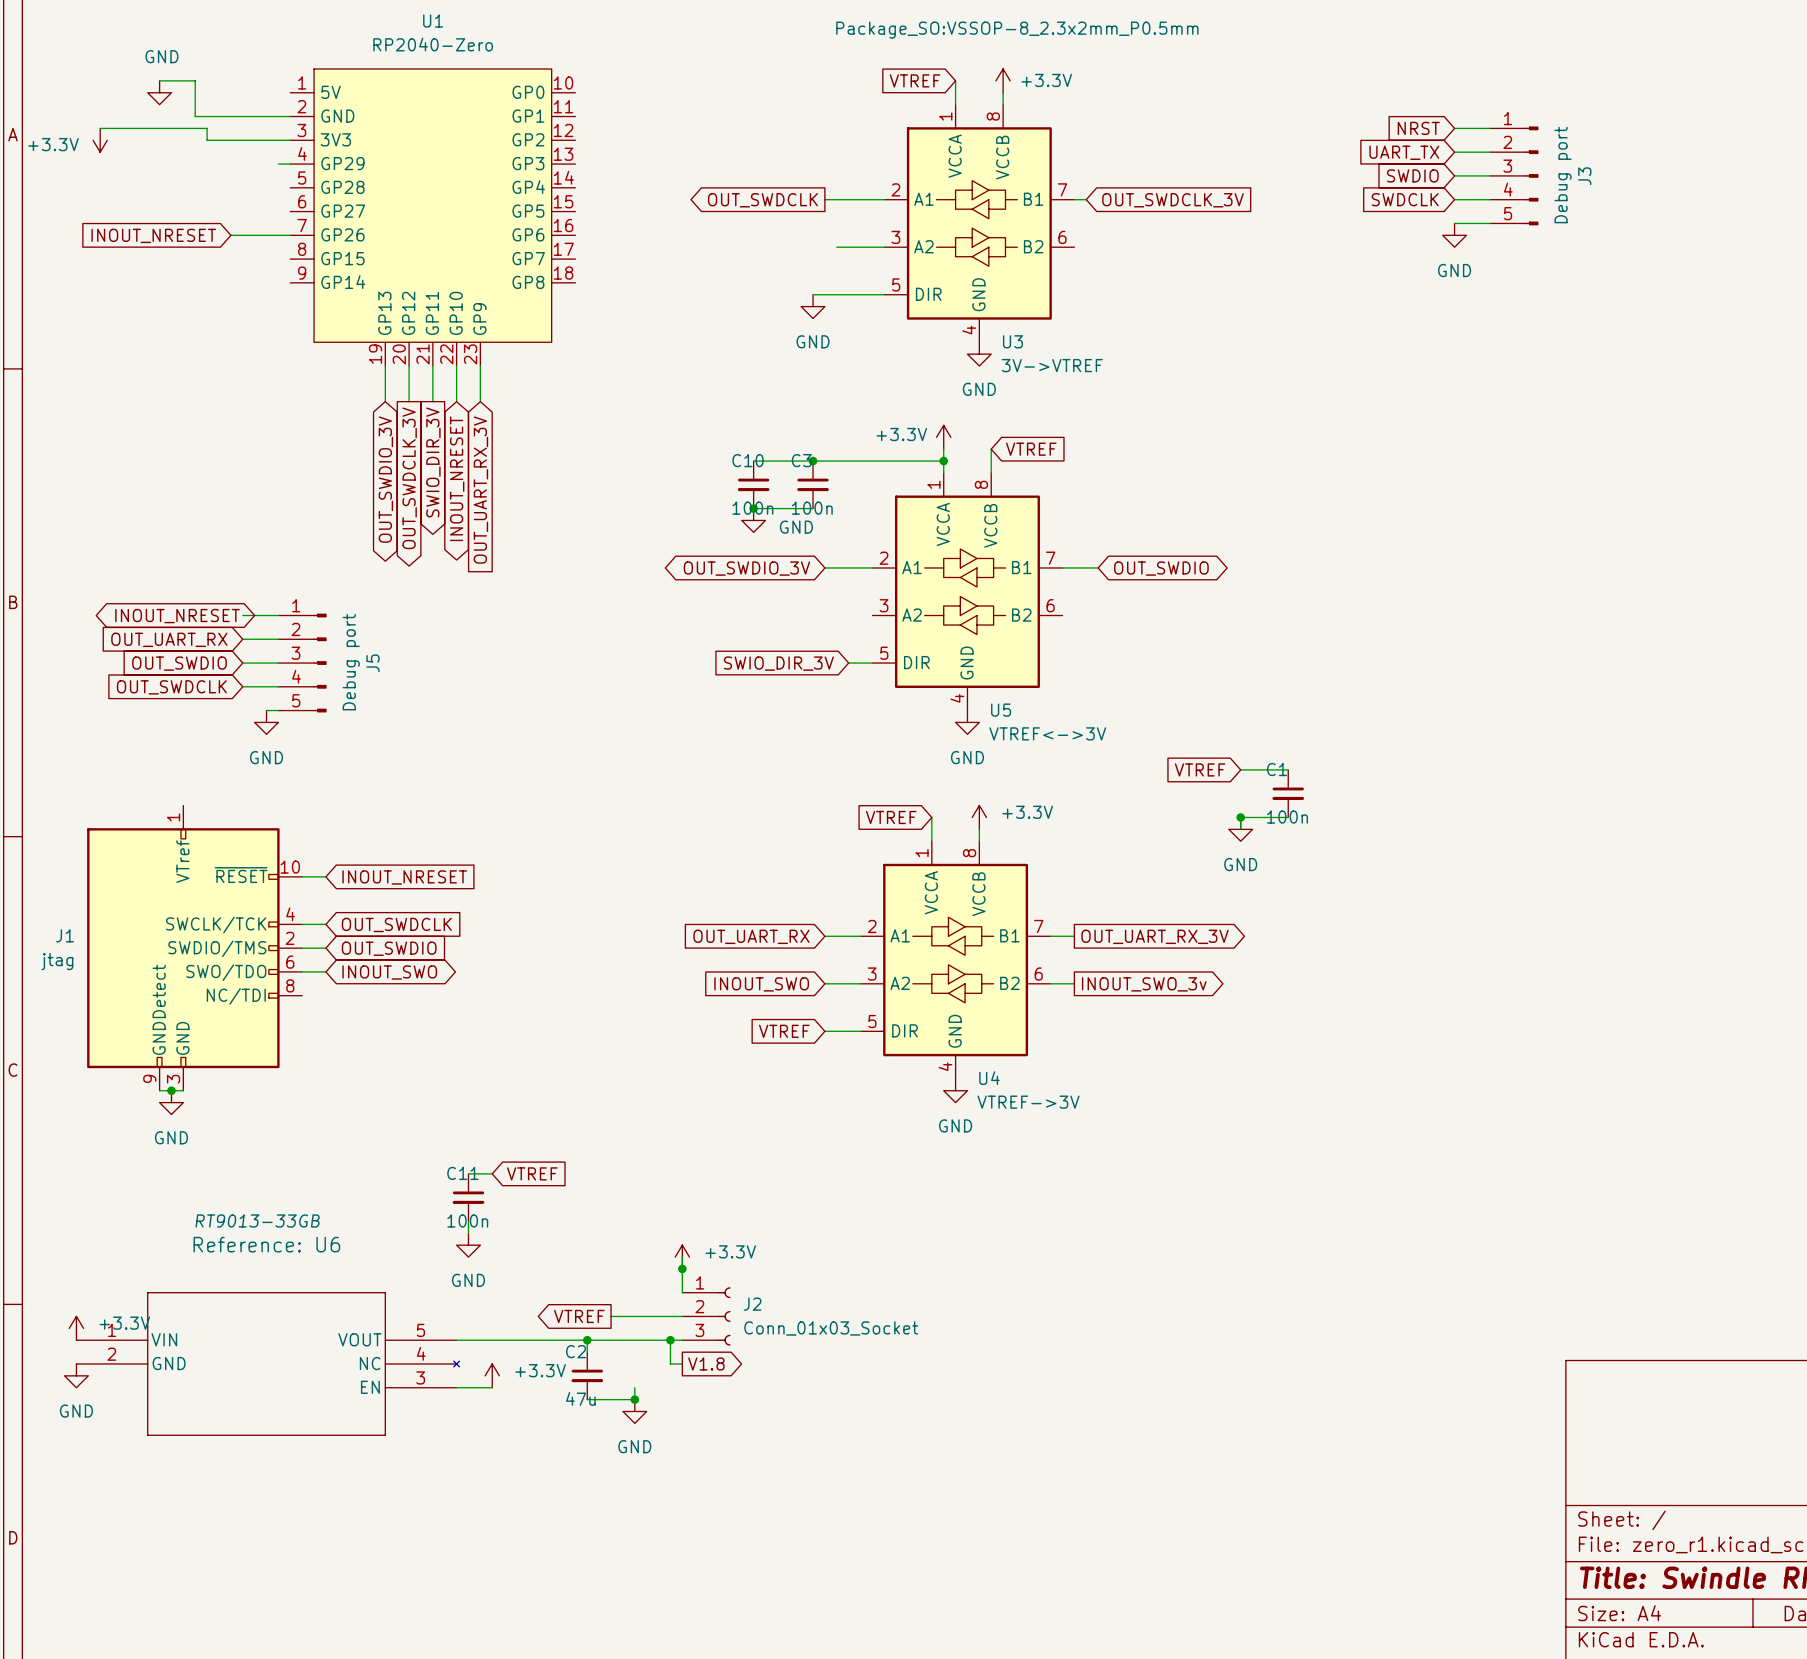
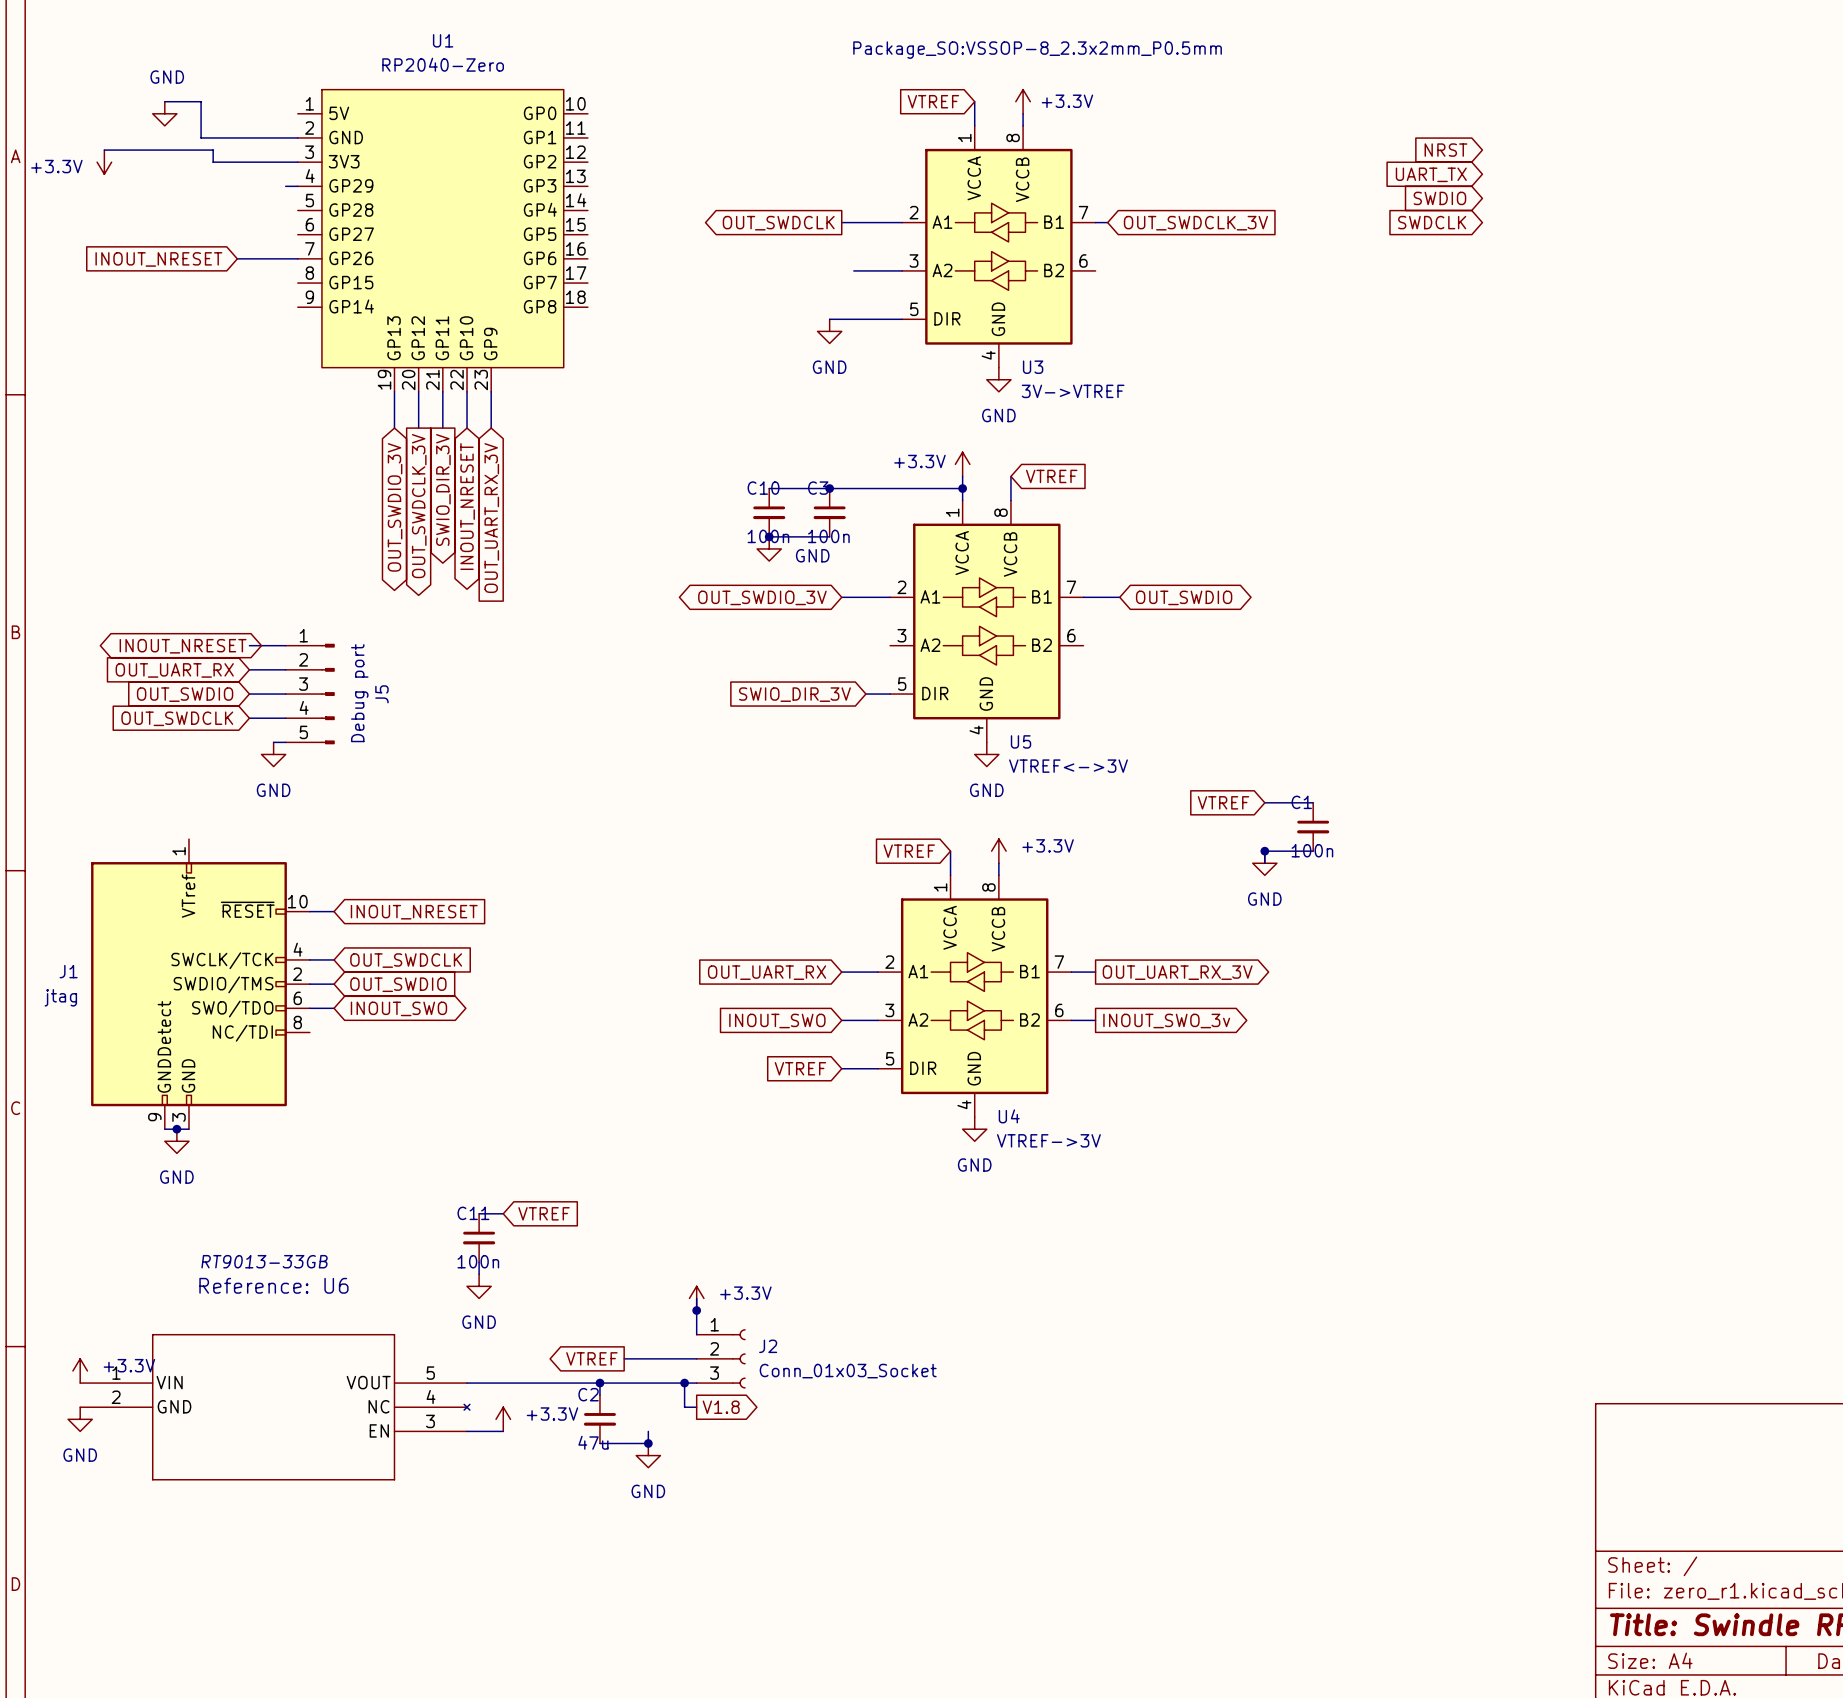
wire: (1454, 128) (1490, 128) -> none
wire: (1454, 152) (1490, 152) -> none
wire: (1454, 175) (1490, 175) -> none
J3: Debug port (1514, 175) -> none
wire: (1454, 199) (1490, 199) -> none
wire: (1454, 223) (1490, 223) -> none
power symbol: GND (1454, 235) -> none

